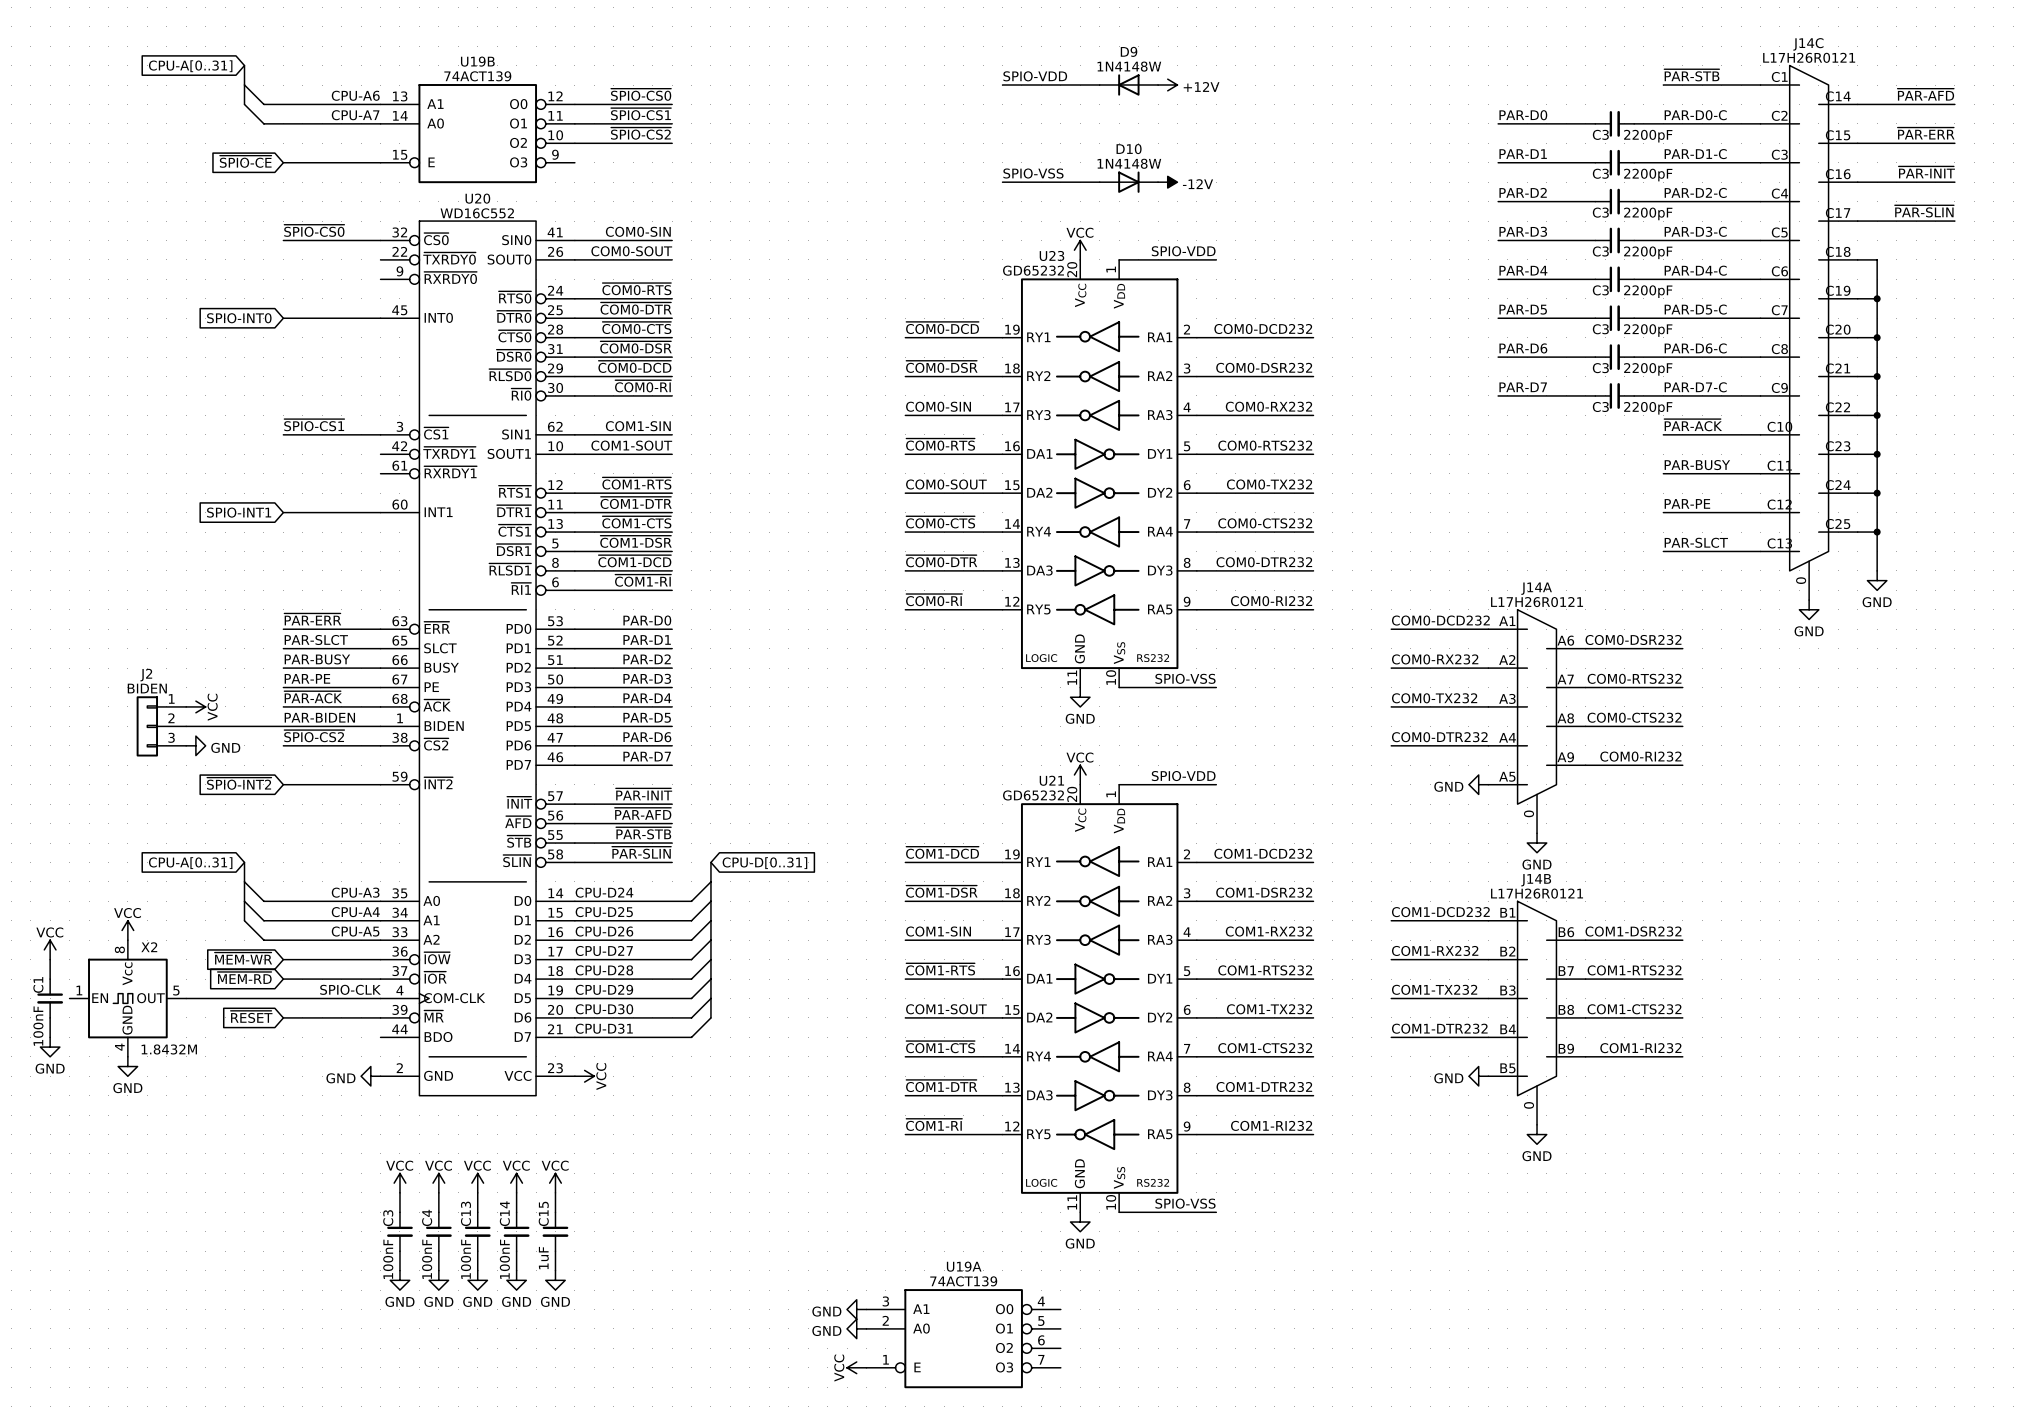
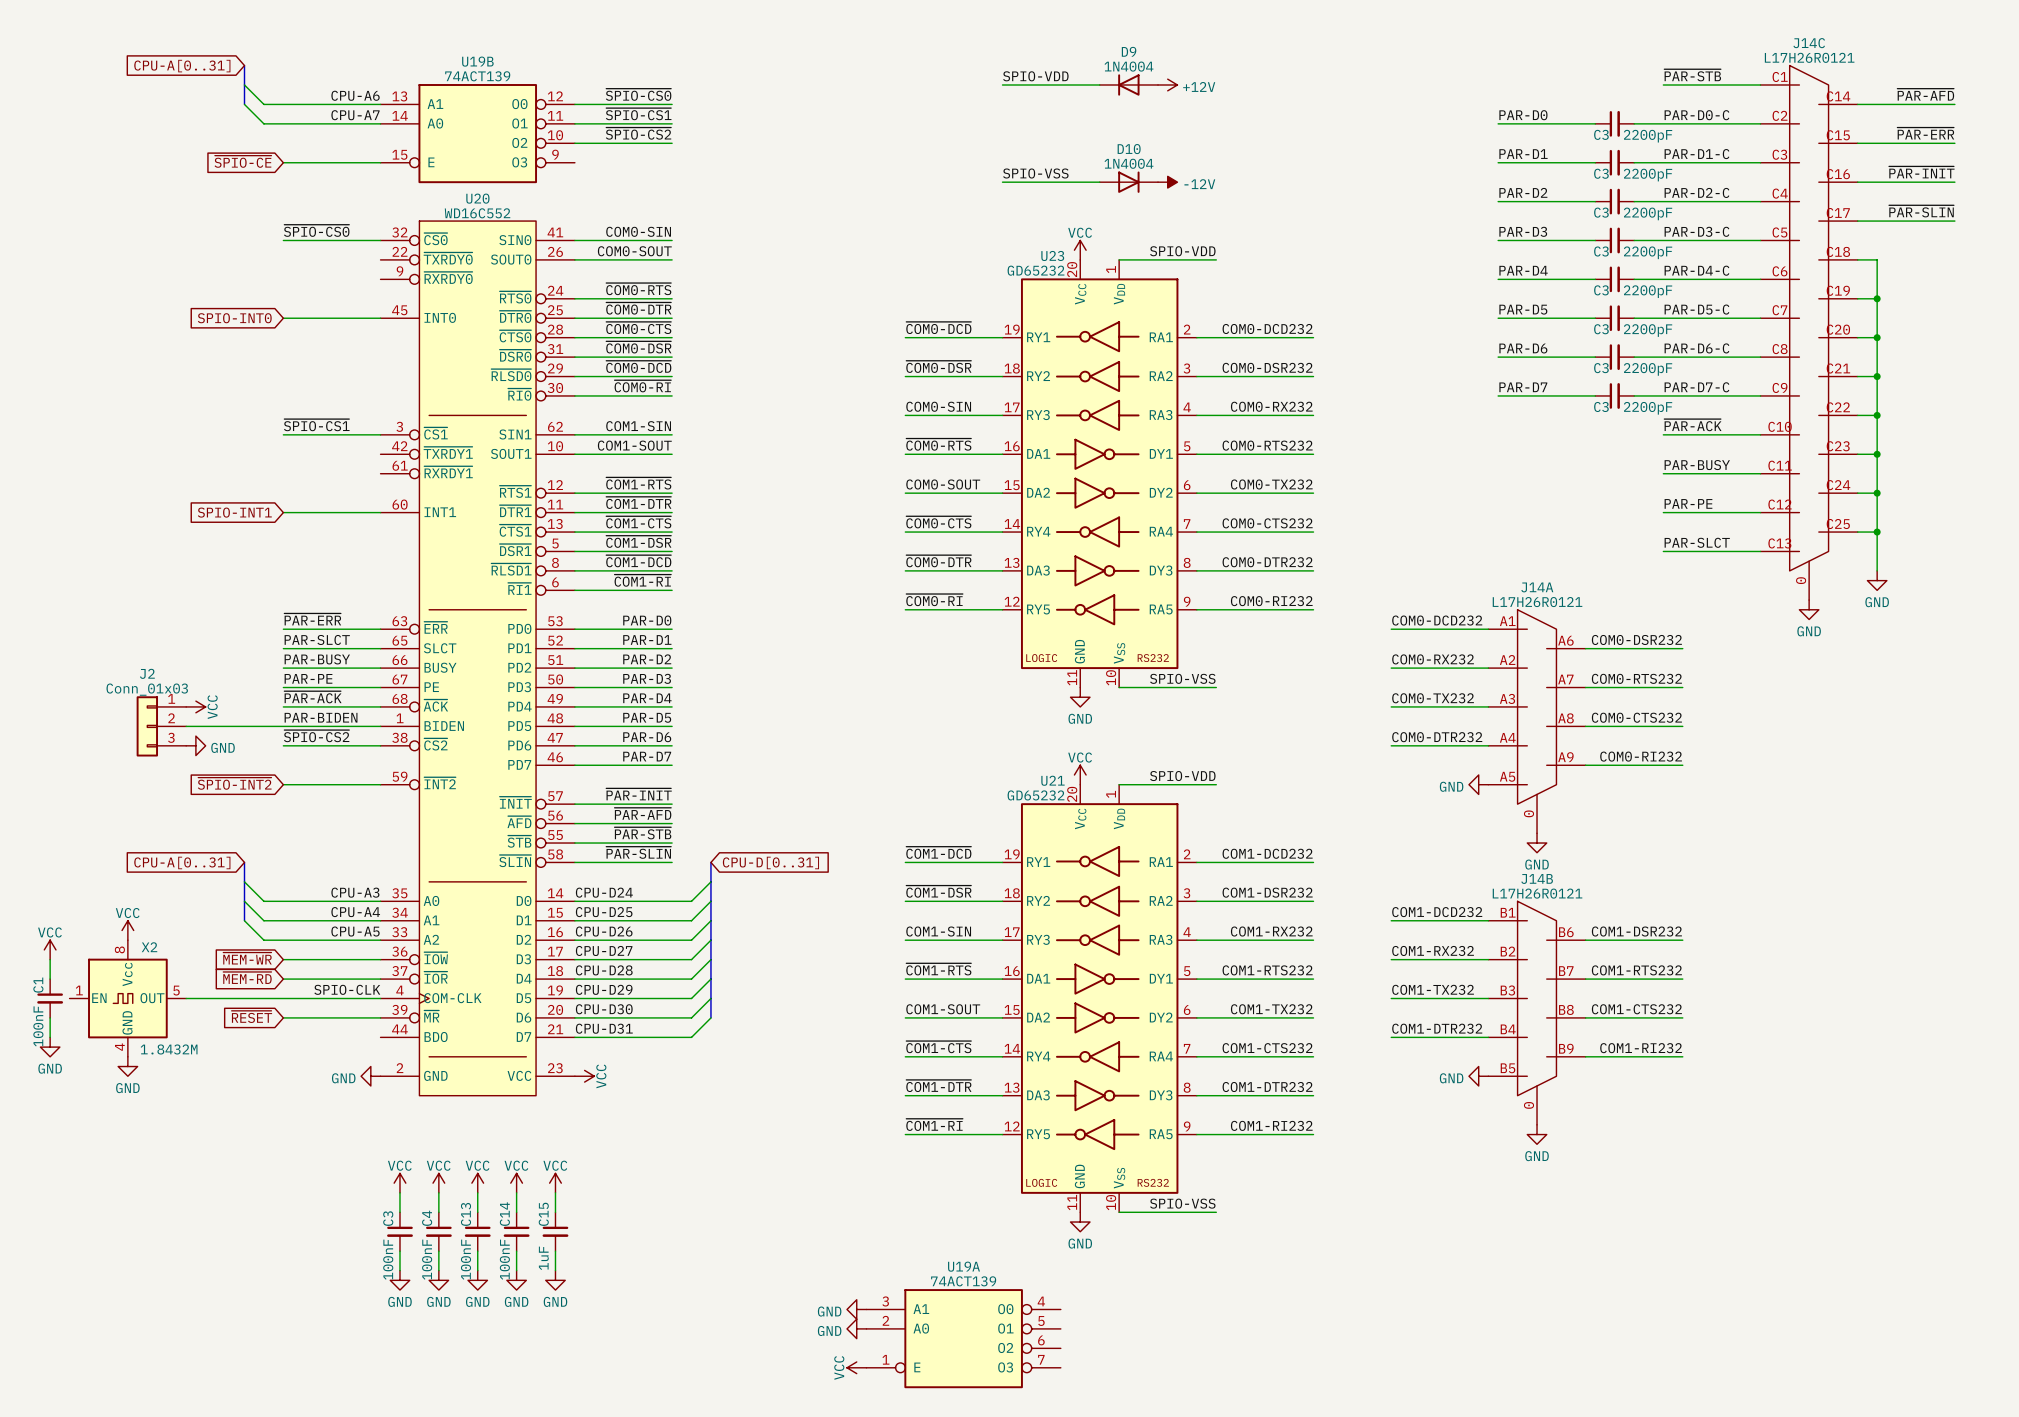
D9 value: 1N4148W (1129, 66) -> 1N4004 (1128, 66)
D10 value: 1N4148W (1129, 163) -> 1N4004 (1128, 163)
J2 value: BIDEN (147, 688) -> Conn_01x03 (147, 689)

